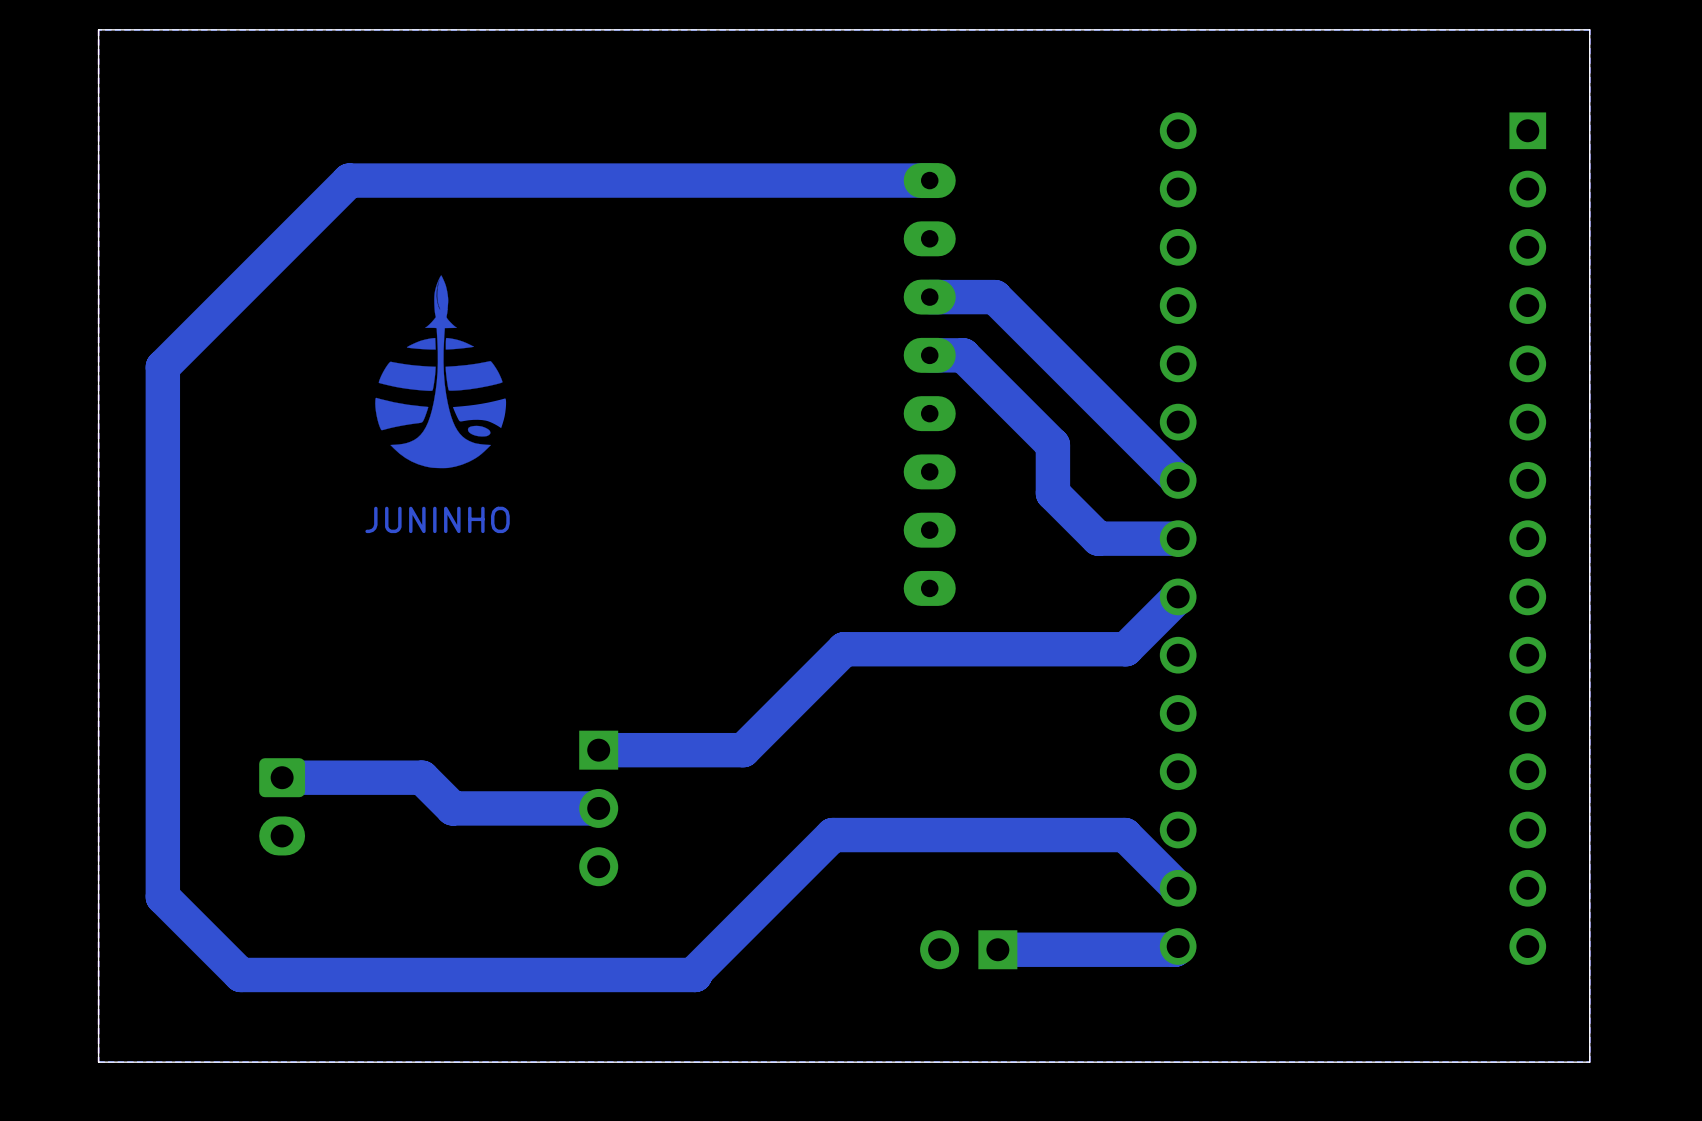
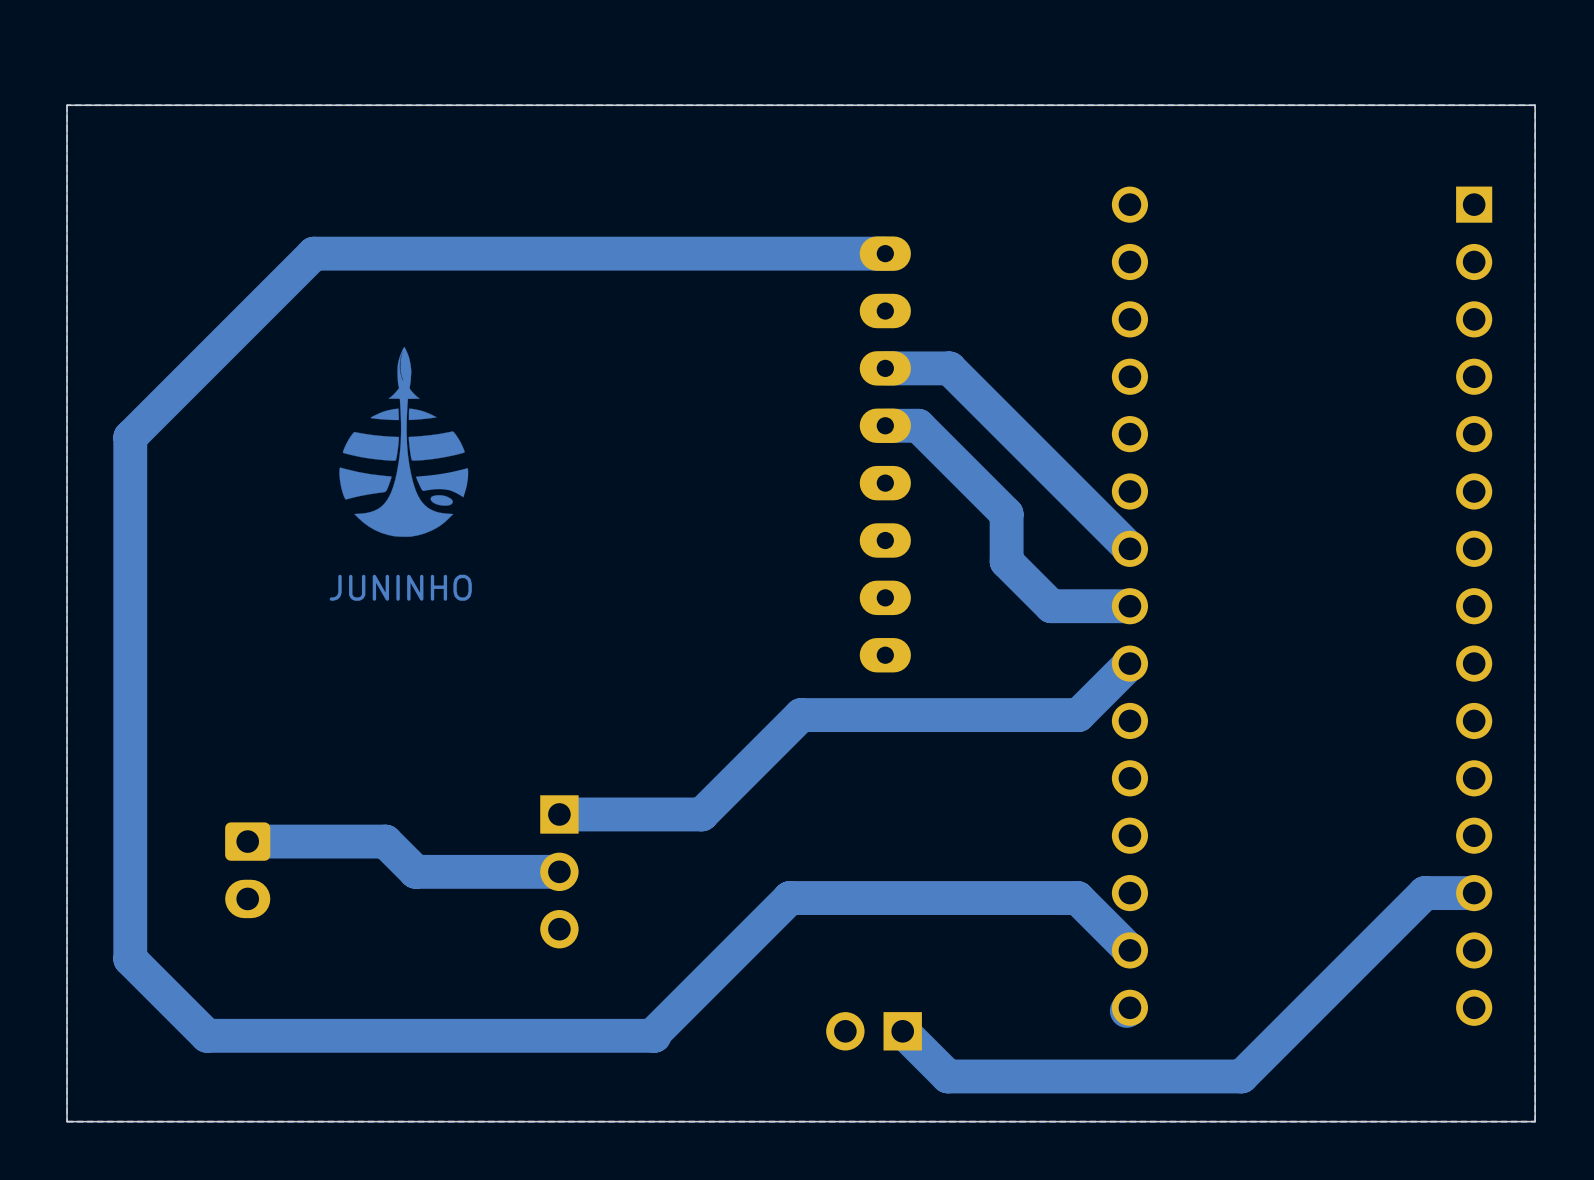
bottom track: none -> (1474, 893) (1424, 893) (1241, 1076) (947, 1076) (902, 1031)
part position: (968, 949) -> (874, 1031)
bottom track: (1174, 949) (997, 949) -> none

